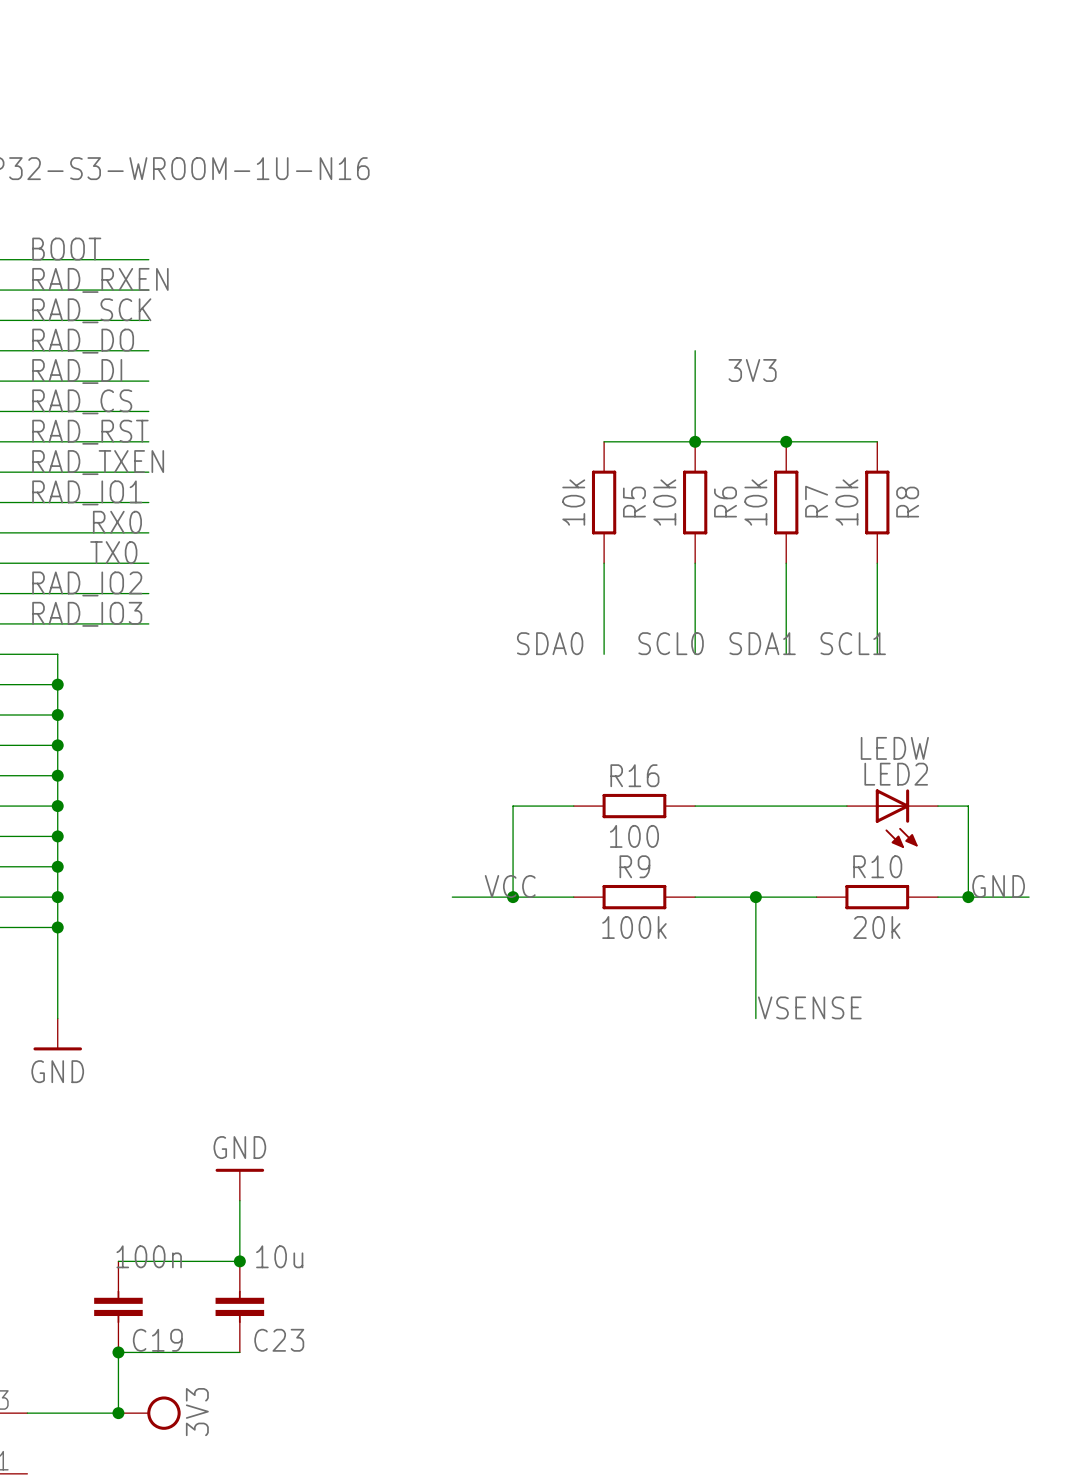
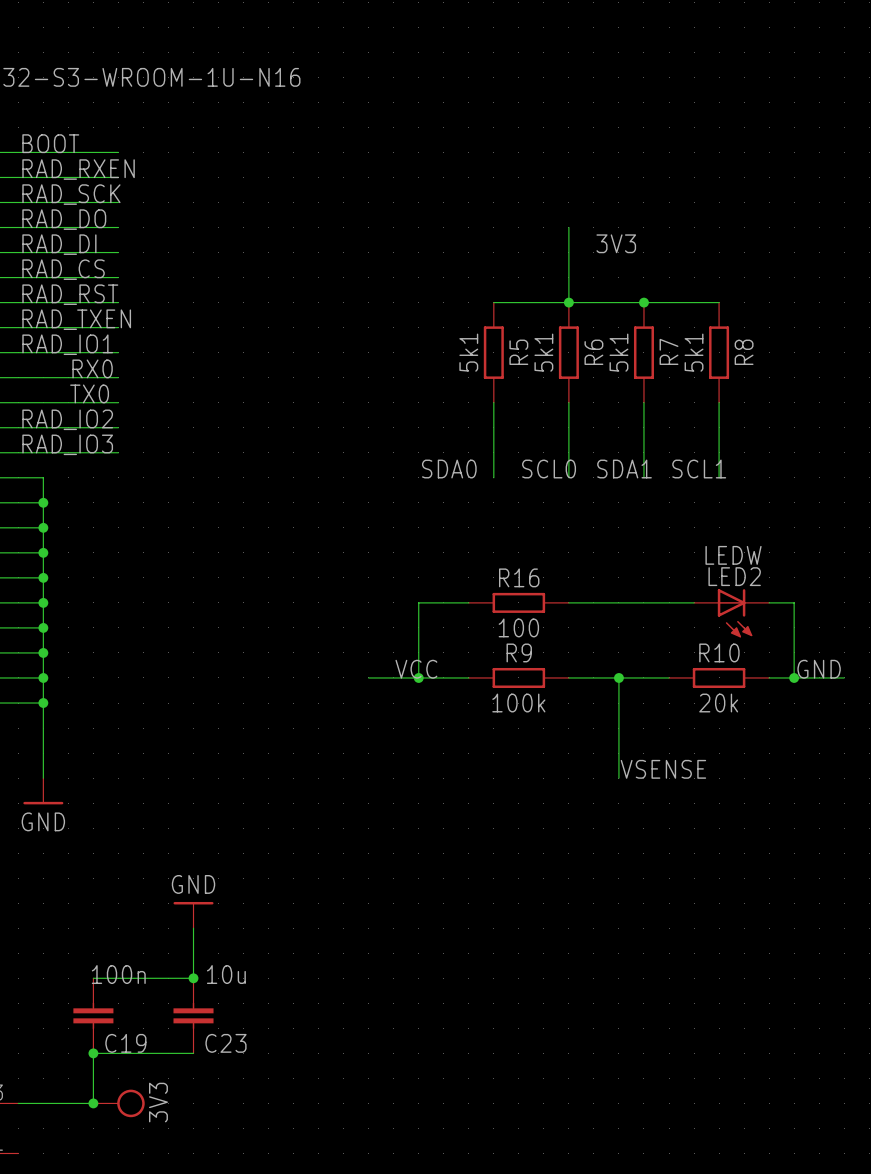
R5 value: 10k (573, 502) -> 5k1 (468, 352)
R6 value: 10k (664, 502) -> 5k1 (543, 352)
R7 value: 10k (755, 502) -> 5k1 (618, 352)
R8 value: 10k (846, 502) -> 5k1 (694, 352)

